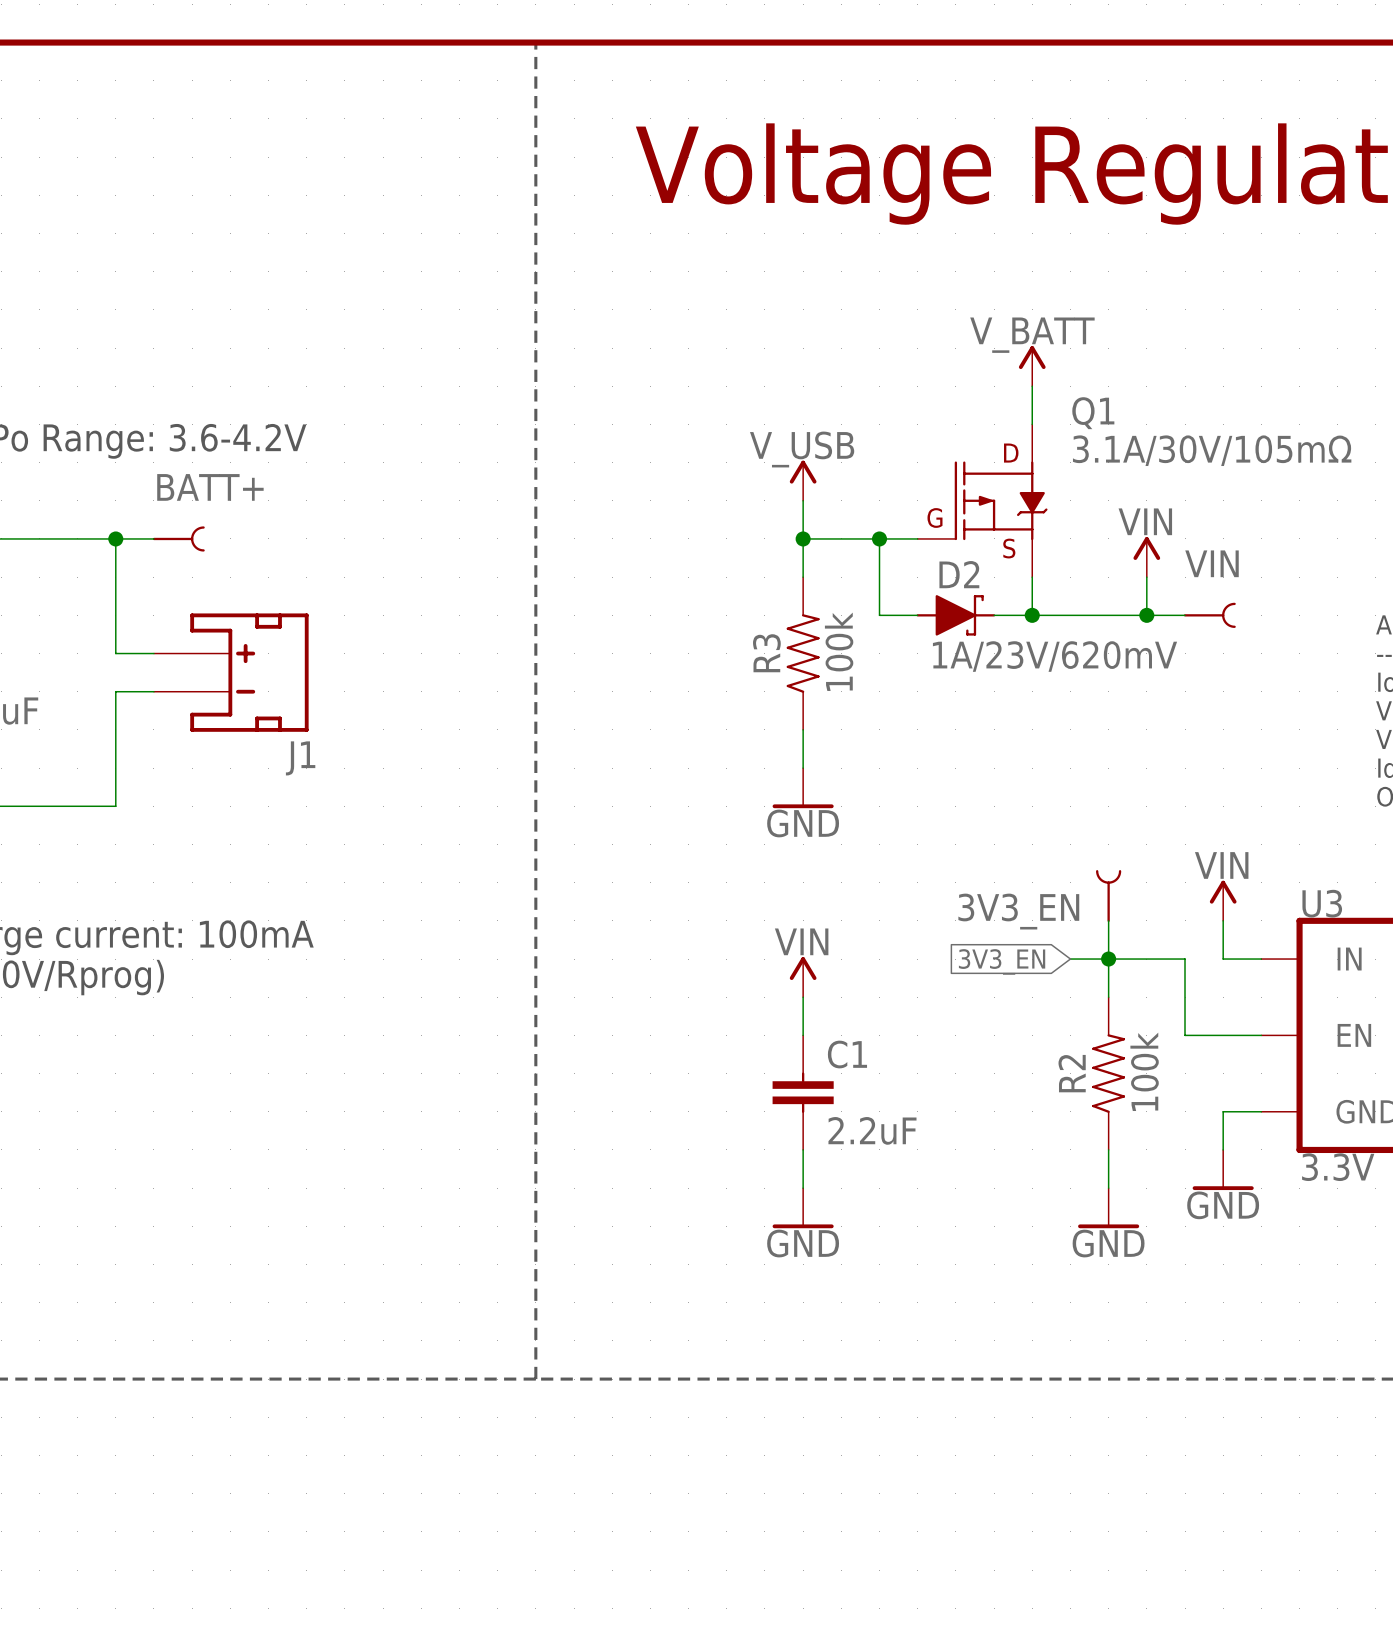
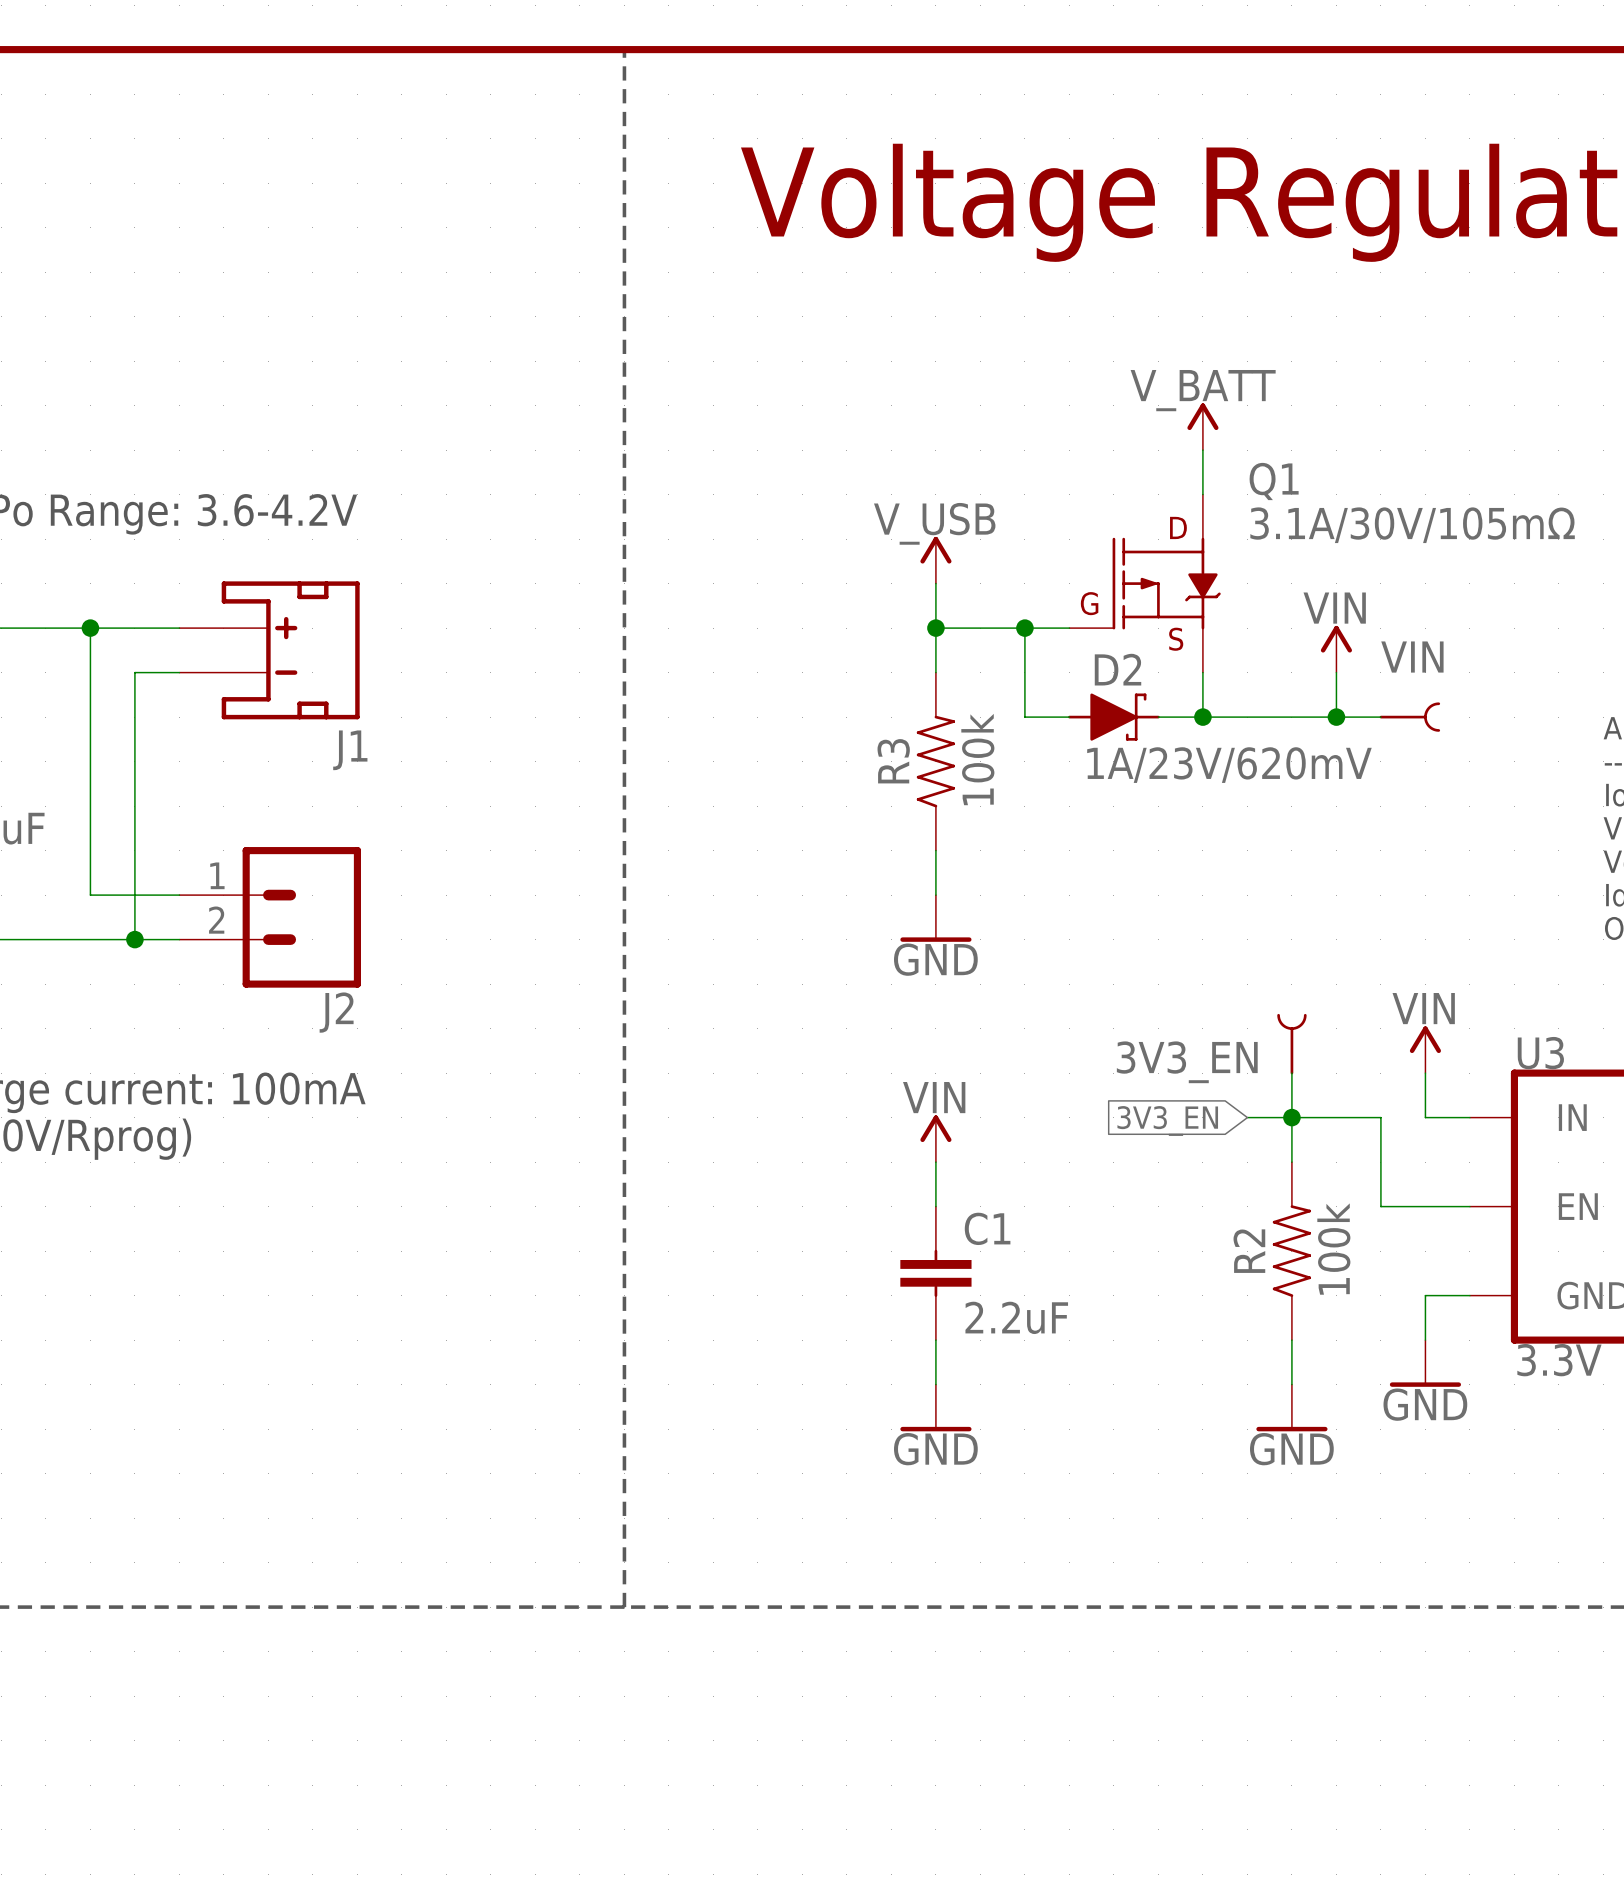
wire: none -> (90, 628) (90, 895) (179, 895)
wire: (115, 538) (115, 577) -> (179, 672) (134, 672)
junction position: (115, 538) -> (90, 628)
BATT+: (178, 538) -> none
wire: (115, 653) (153, 653) -> (134, 761) (134, 806)
J1 position: (231, 672) -> (269, 650)
wire: (115, 691) (153, 691) -> (134, 939) (179, 939)
J2: none -> (270, 917)
junction: none -> (134, 939)

